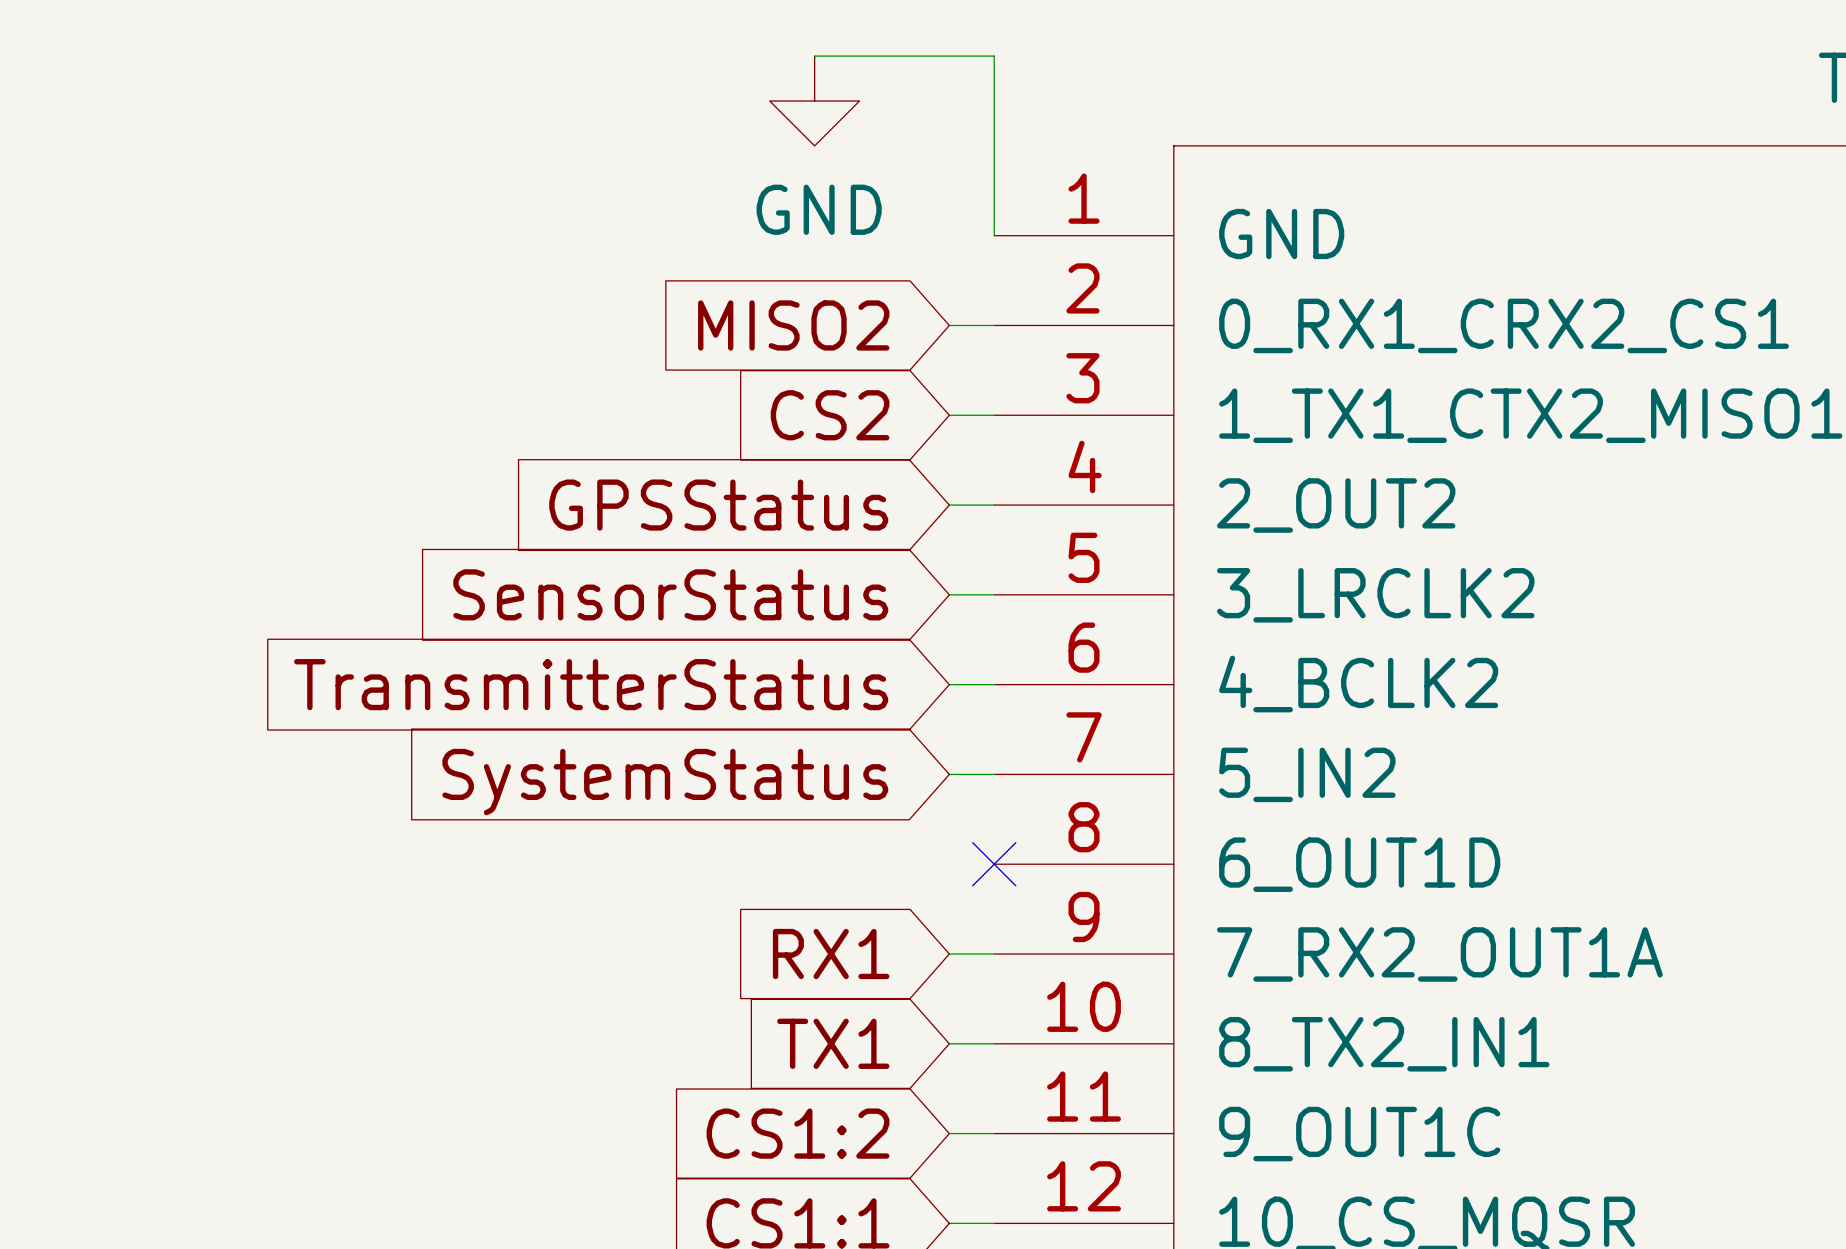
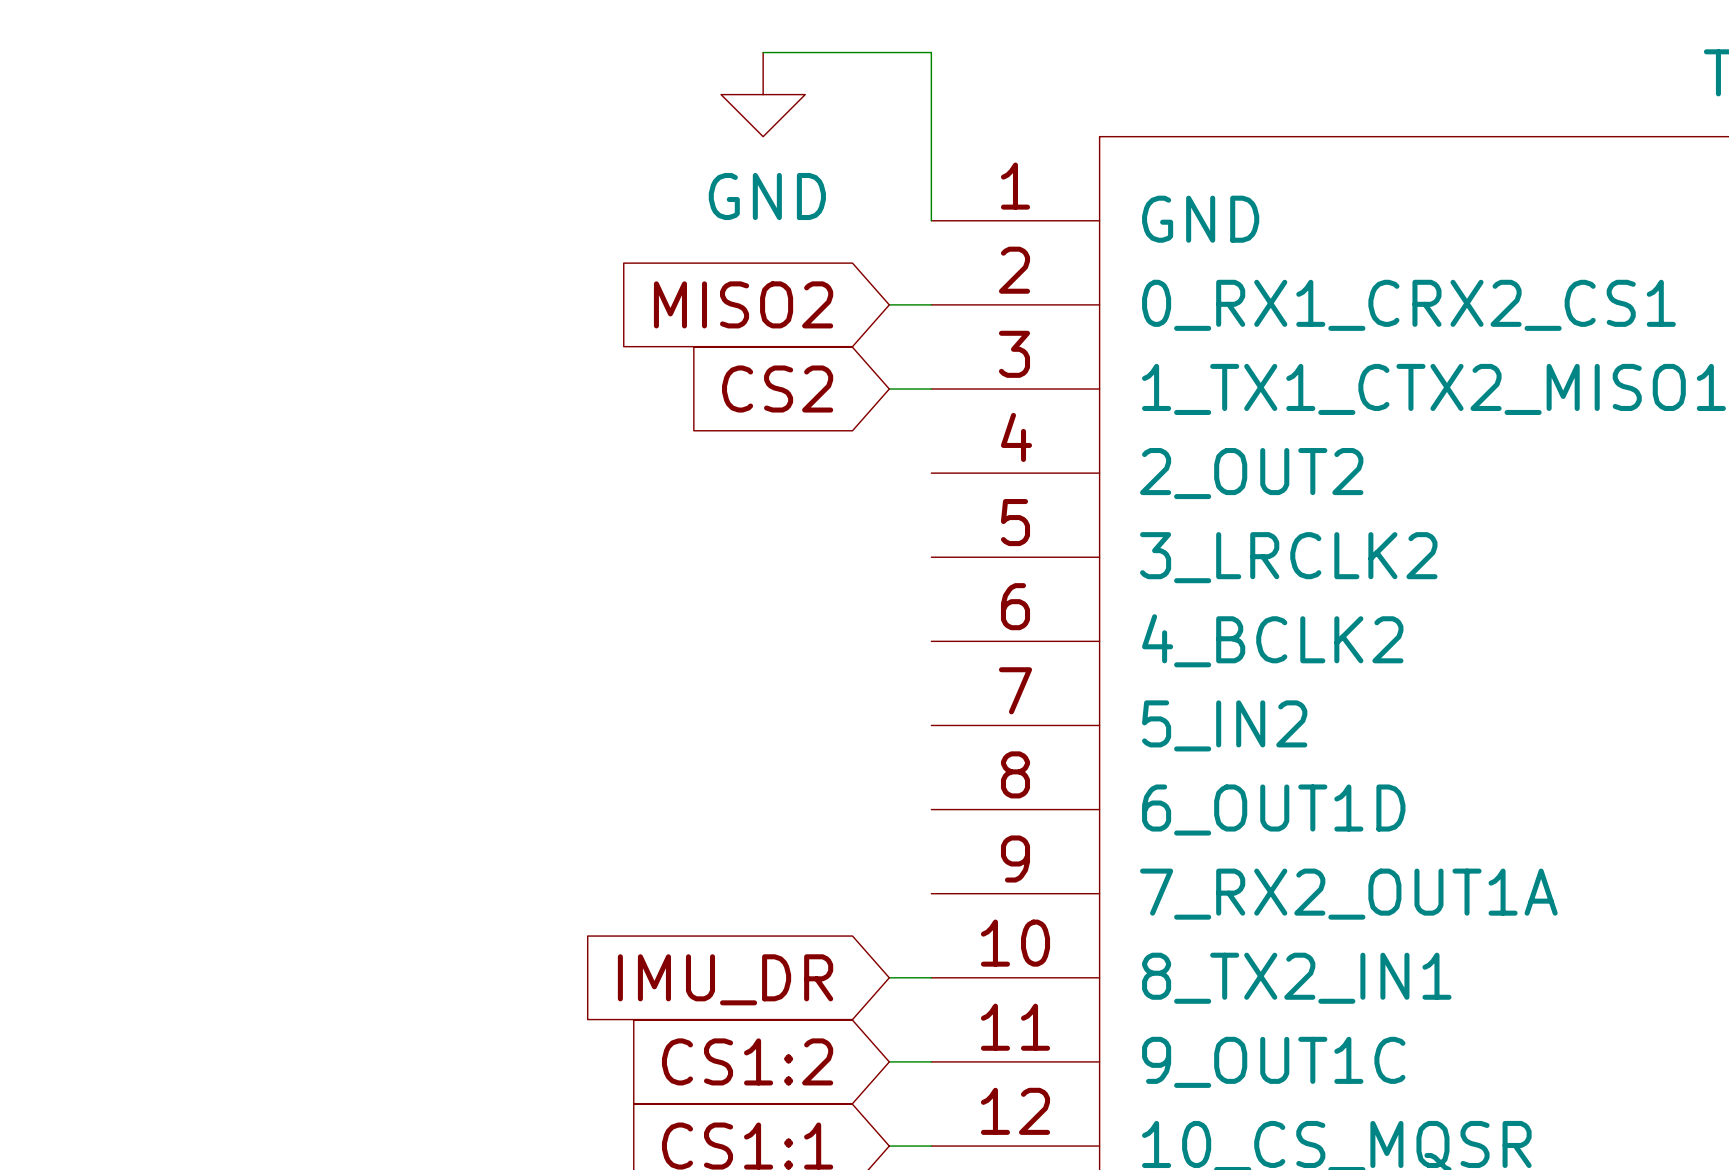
global label: GPSStatus (718, 505) -> none
wire: (949, 505) (994, 505) -> none
global label: SensorStatus (670, 594) -> none
wire: (949, 594) (994, 594) -> none
global label: TransmitterStatus (591, 684) -> none
wire: (949, 684) (994, 684) -> none
wire: (949, 774) (994, 774) -> none
global label: SystemStatus (665, 782) -> none
no-connect mark: (994, 864) -> none
global label: RX1 (831, 954) -> none
wire: (949, 954) (994, 954) -> none
global label: TX1 (833, 1043) -> IMU_DR (725, 979)

